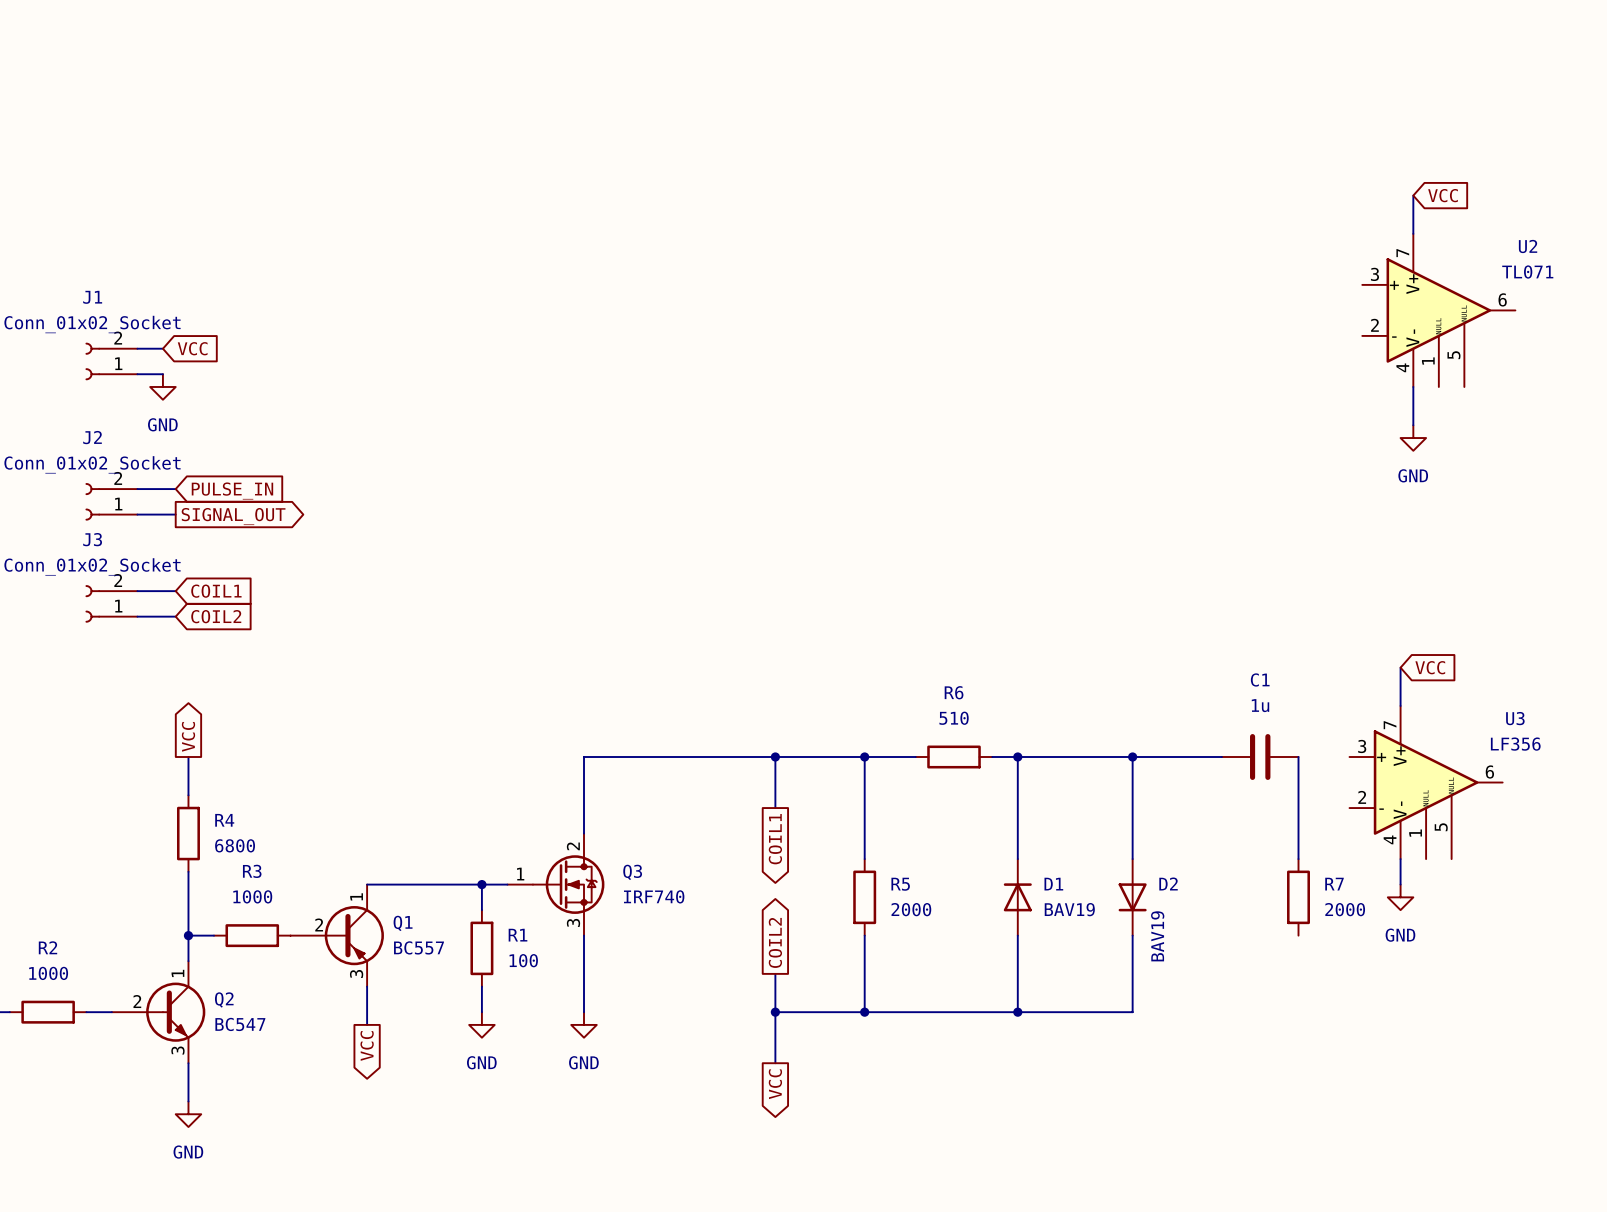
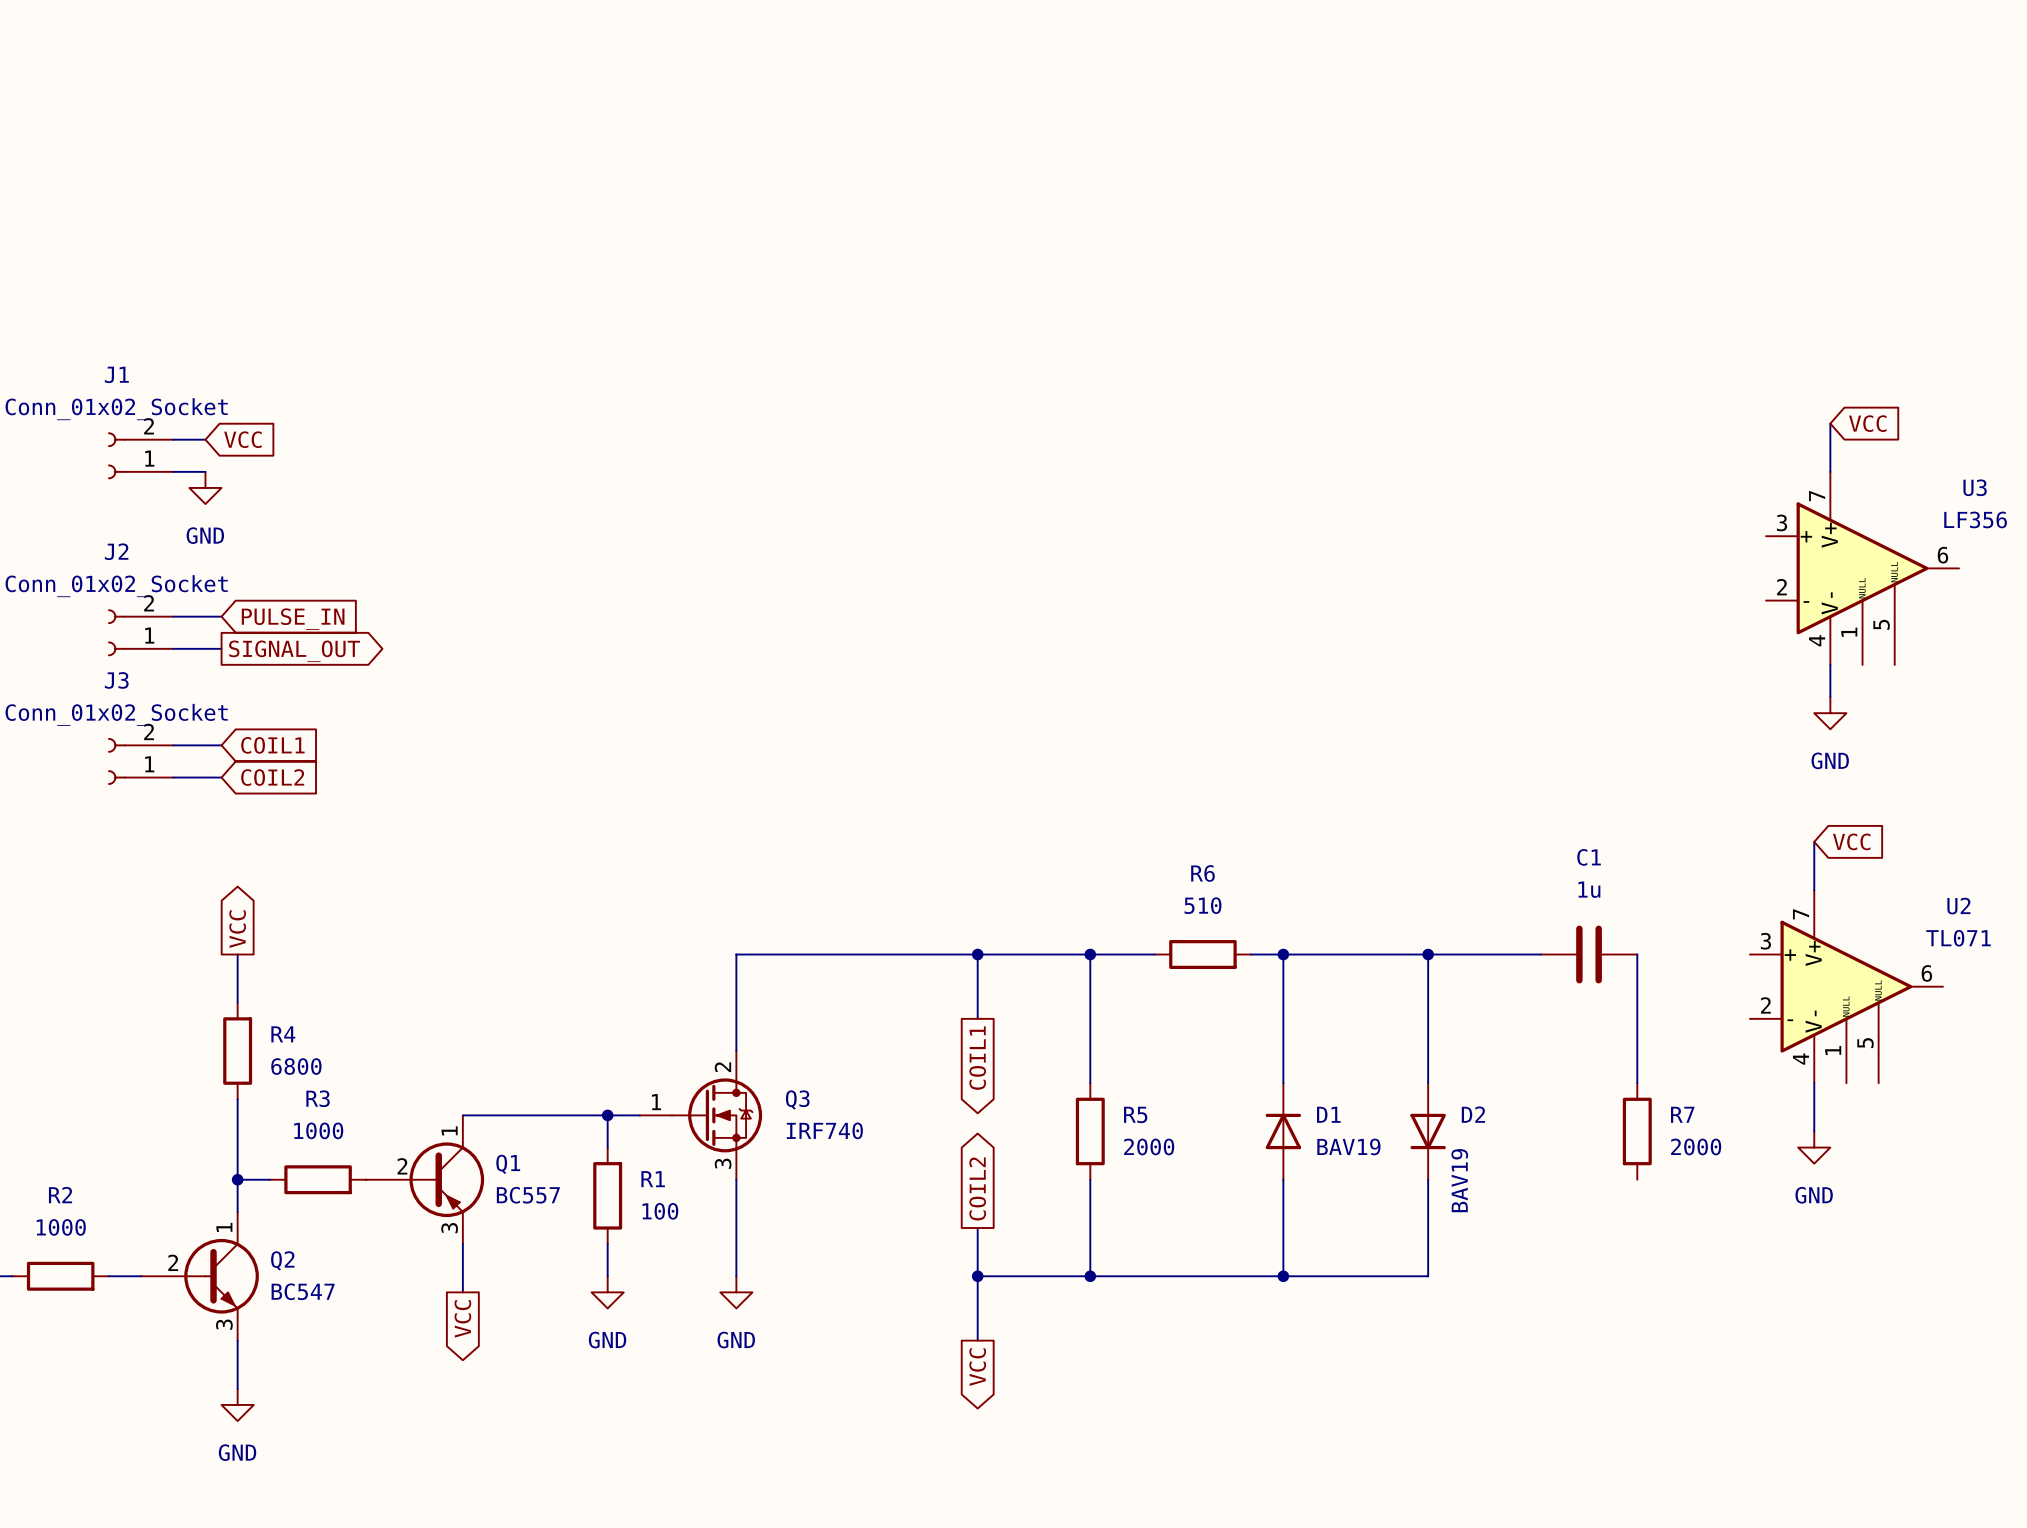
wire: (1413, 195) (1413, 233) -> none
global label position: VCC (1443, 195) -> VCC (1867, 423)
U2 position: (1438, 310) -> (1846, 986)
wire: (1413, 386) (1413, 425) -> (1830, 423) (1830, 471)
power symbol position: GND (1413, 438) -> GND (1830, 713)
wire: none -> (1830, 664) (1830, 697)
wire: (1400, 667) (1400, 705) -> (1814, 841) (1814, 890)
global label position: VCC (1430, 667) -> VCC (1851, 841)
U3 position: (1426, 782) -> (1862, 568)
wire: (1400, 859) (1400, 884) -> none
wire: none -> (1814, 1083) (1814, 1131)
power symbol position: GND (1400, 897) -> GND (1814, 1147)

